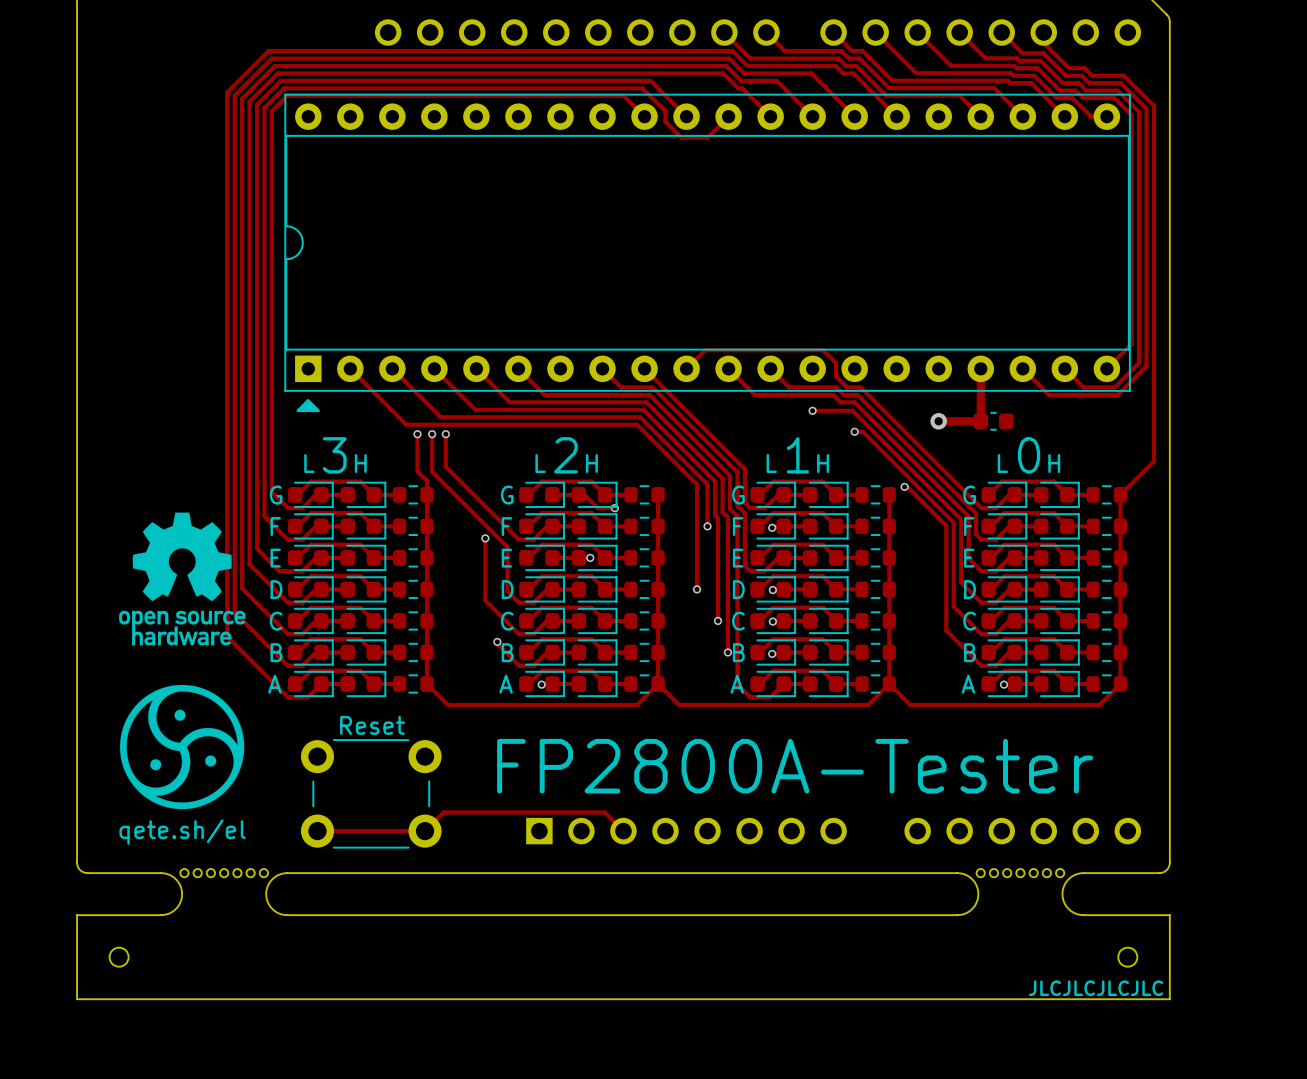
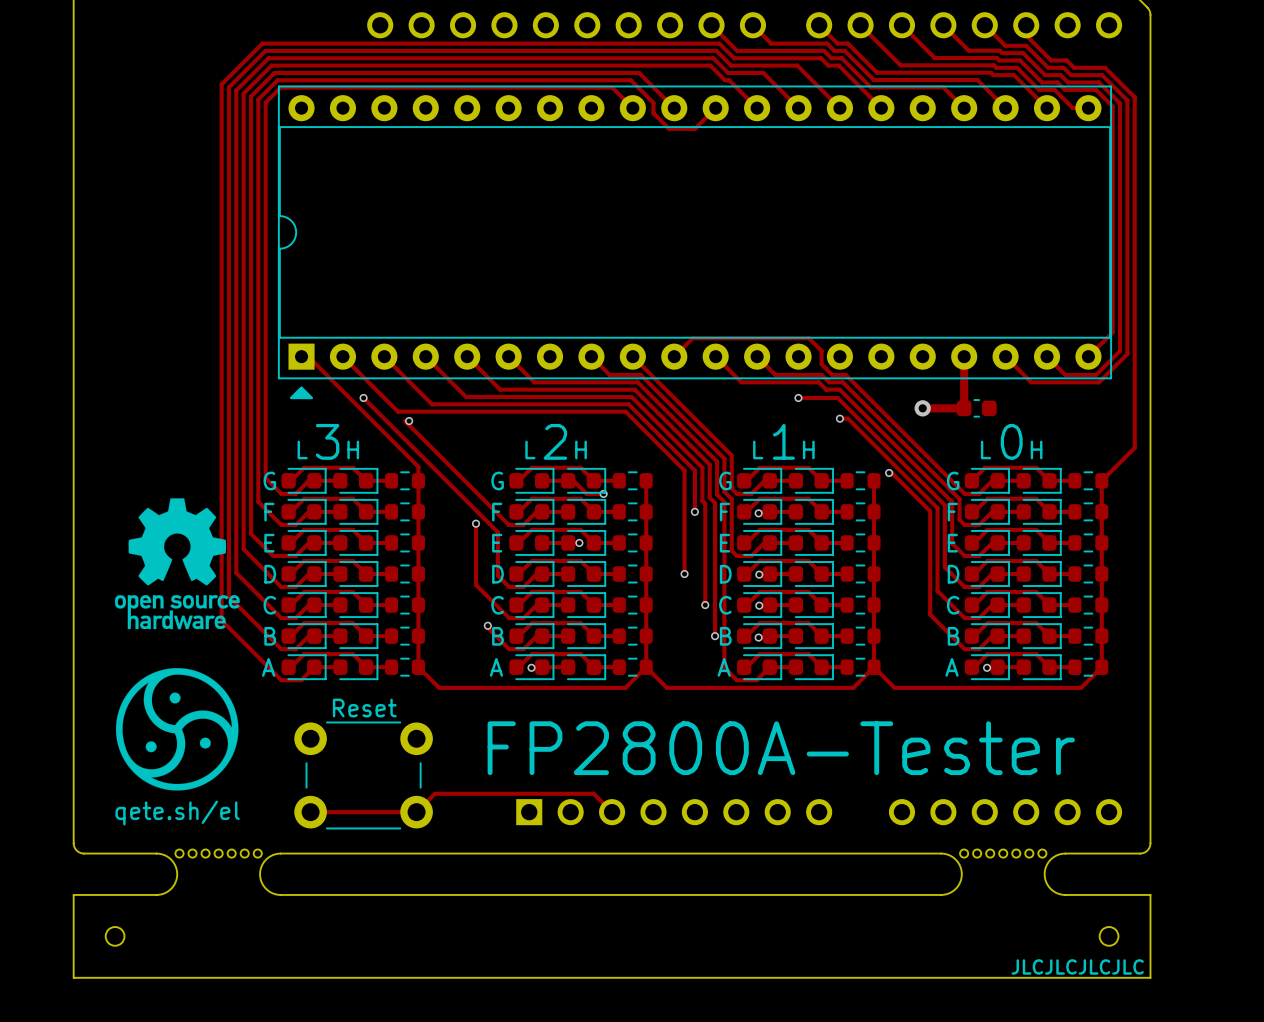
via: none -> (363, 397)
track: (417, 434) (417, 471) -> (301, 356) (308, 356) (409, 457)
track: (432, 434) (432, 471) -> (363, 397) (423, 457)
via: (432, 434) -> none
track: (445, 434) (445, 466) -> (405, 421) (437, 453)
via: (445, 434) -> none

